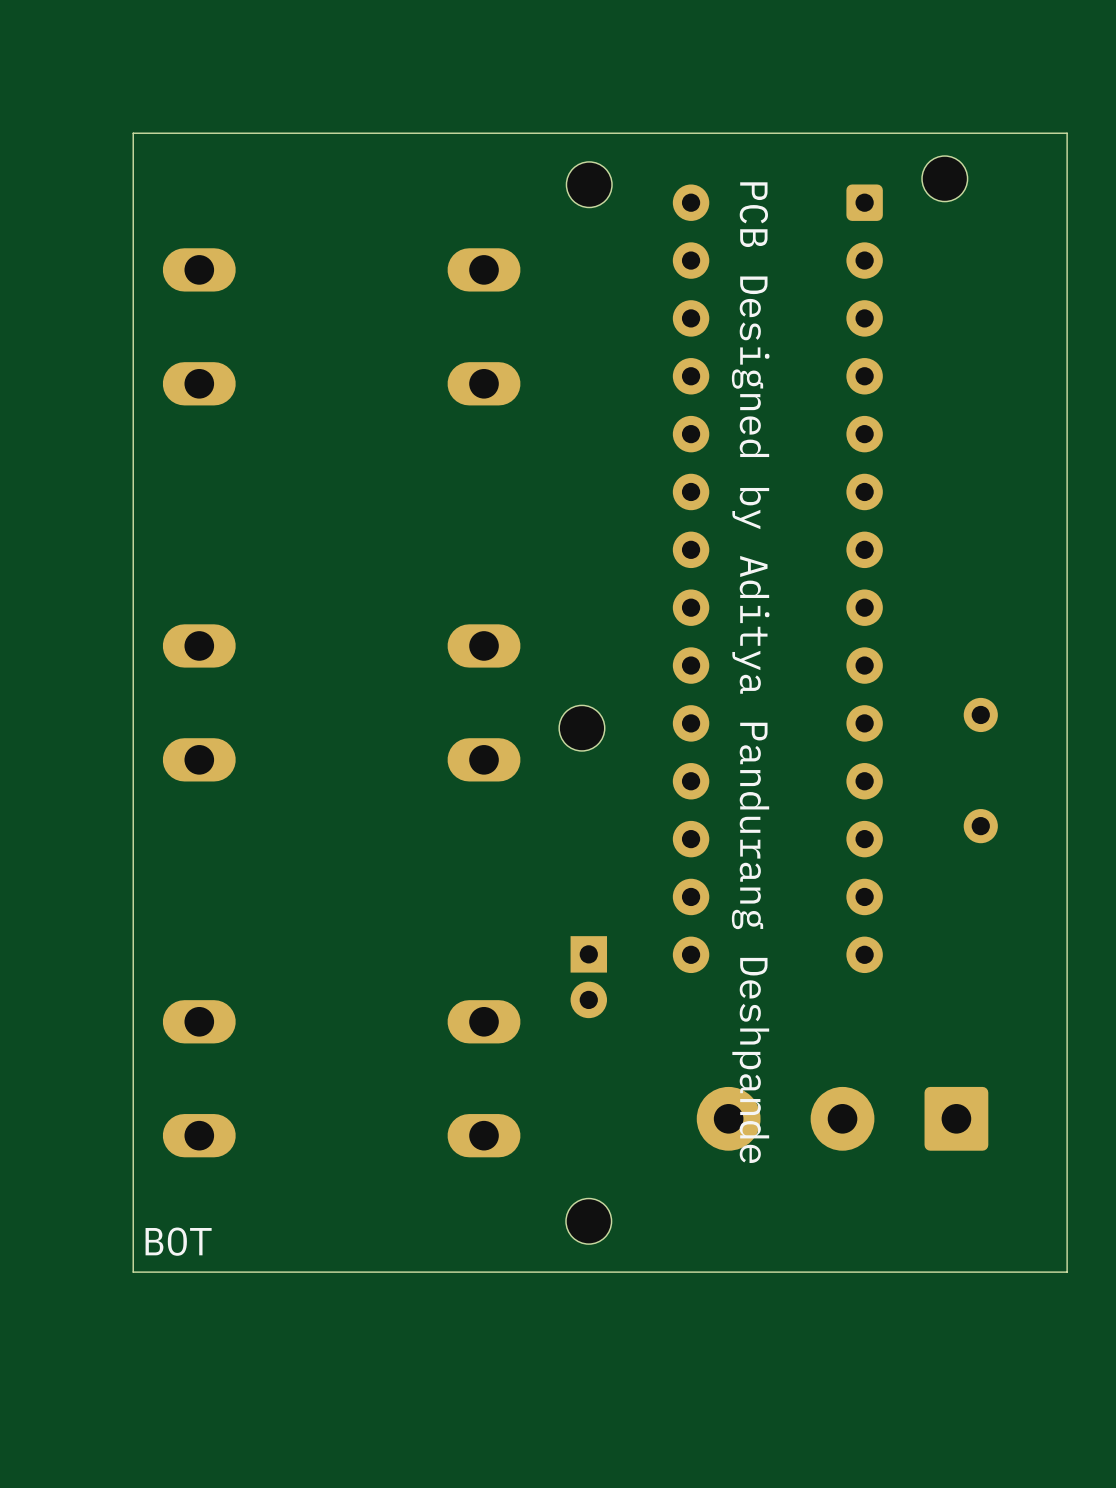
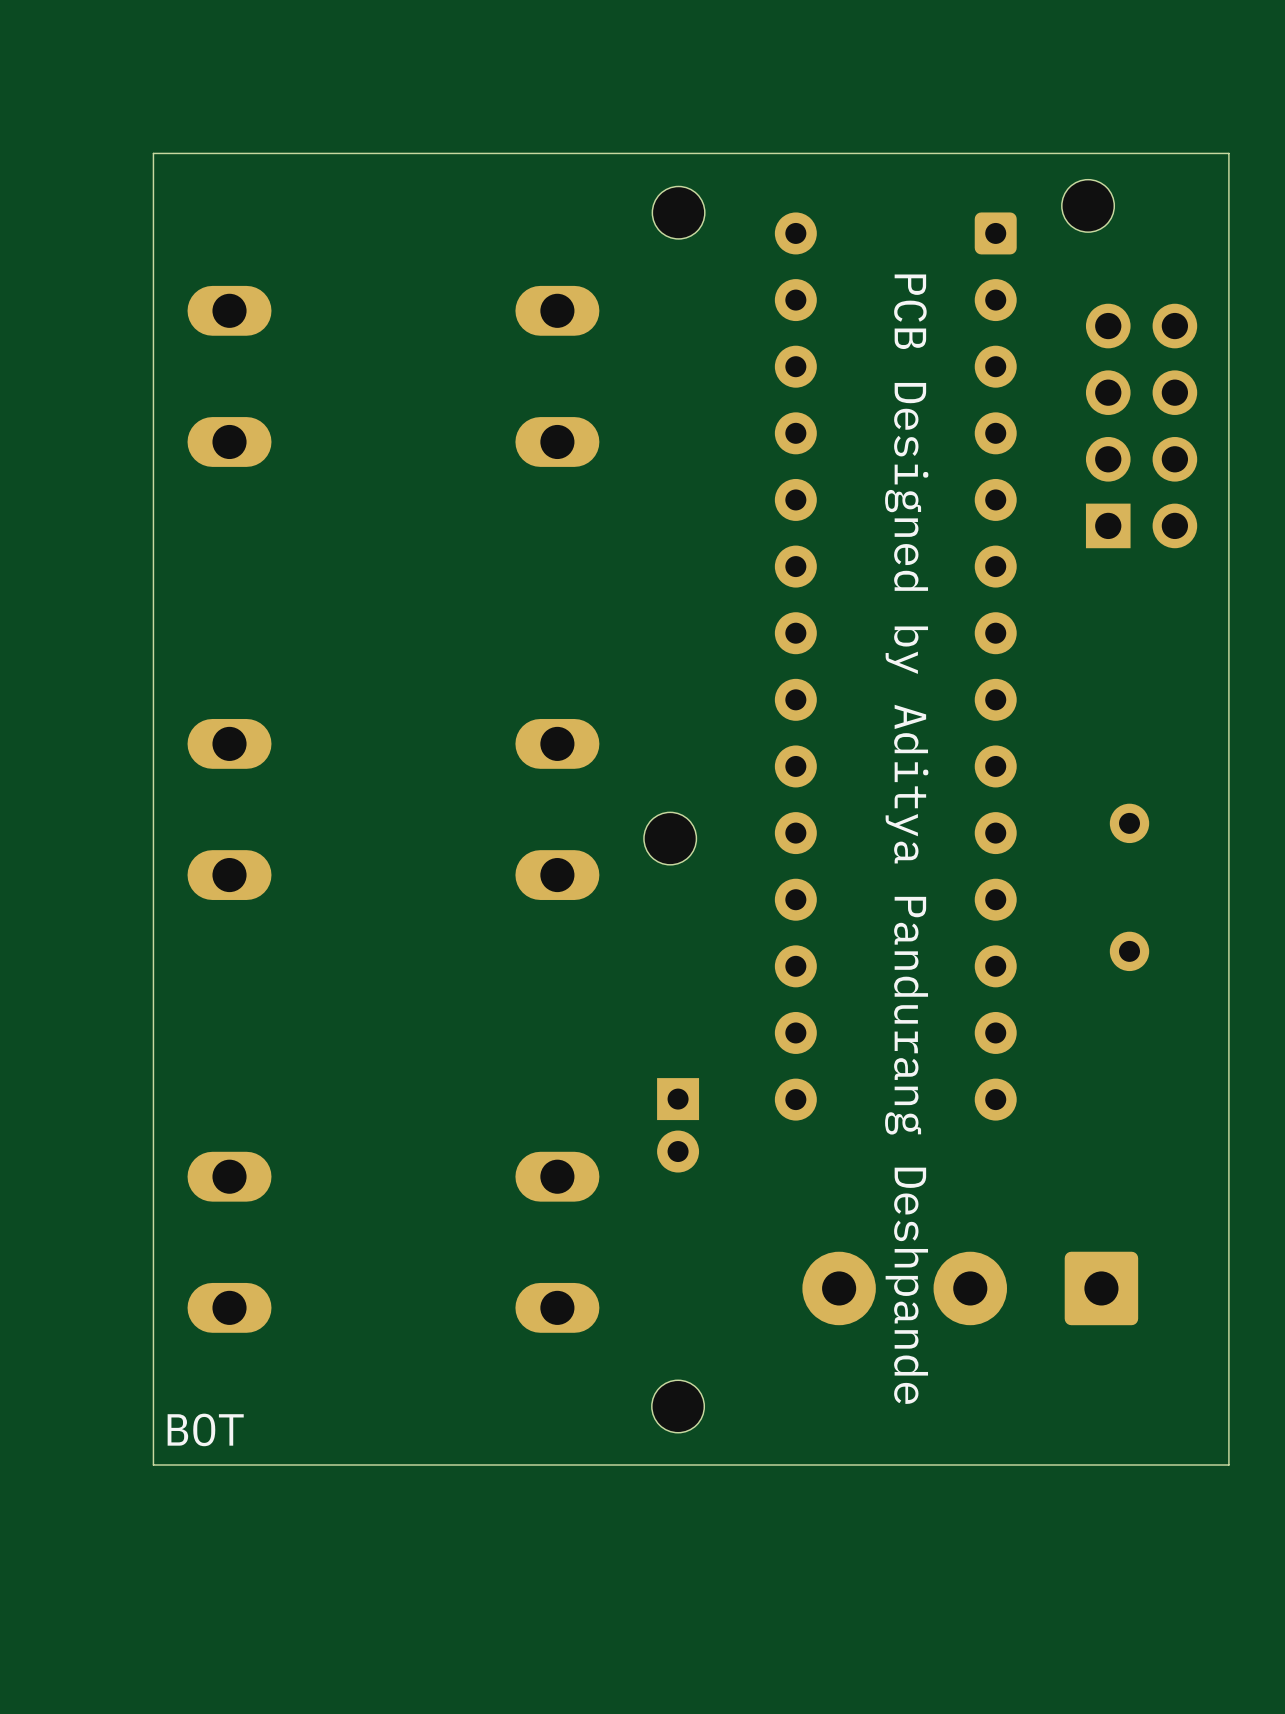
part: none -> (1141, 425)
text position: PCB Designed by Aditya Pandurang Deshpande (750, 672) -> PCB Designed by Aditya Pandurang Deshpande (906, 839)

